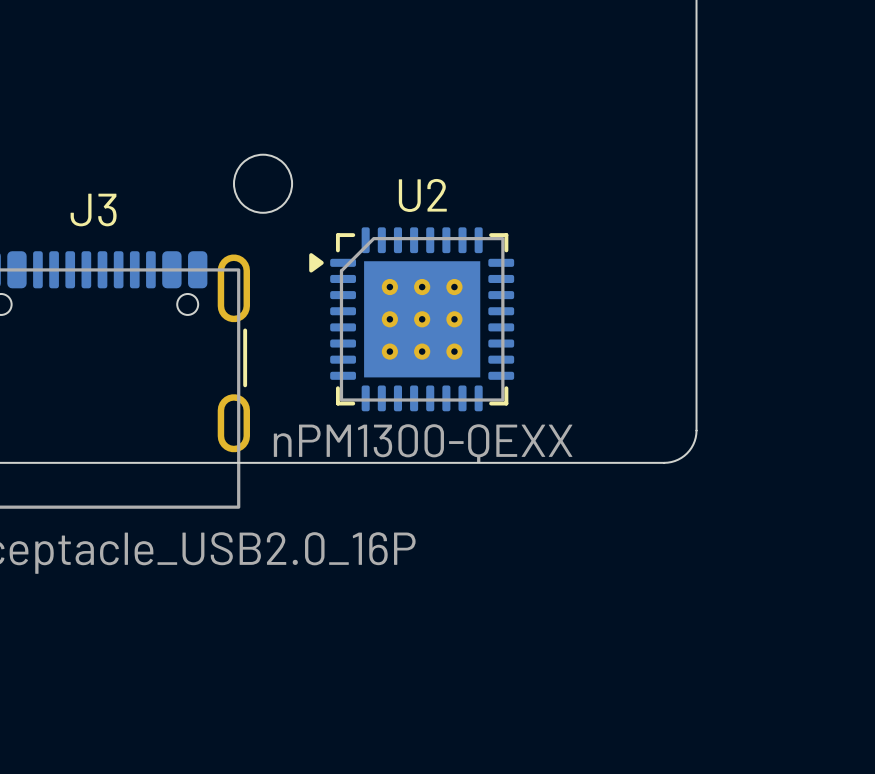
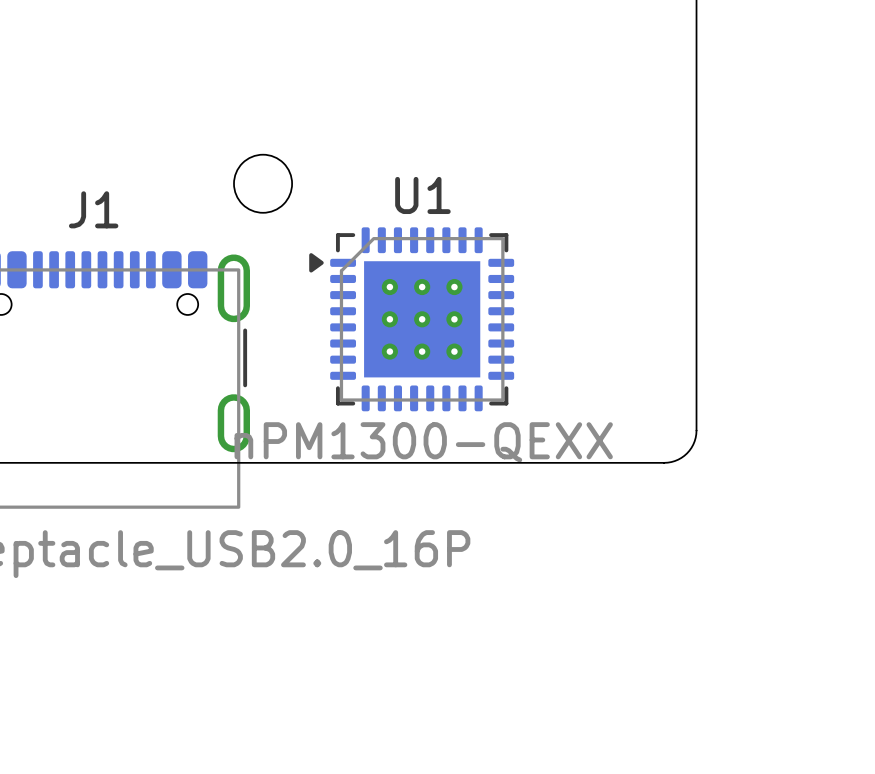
U2 name: U2 (422, 195) -> U1 (422, 195)
J3 name: J3 (93, 210) -> J1 (93, 209)

